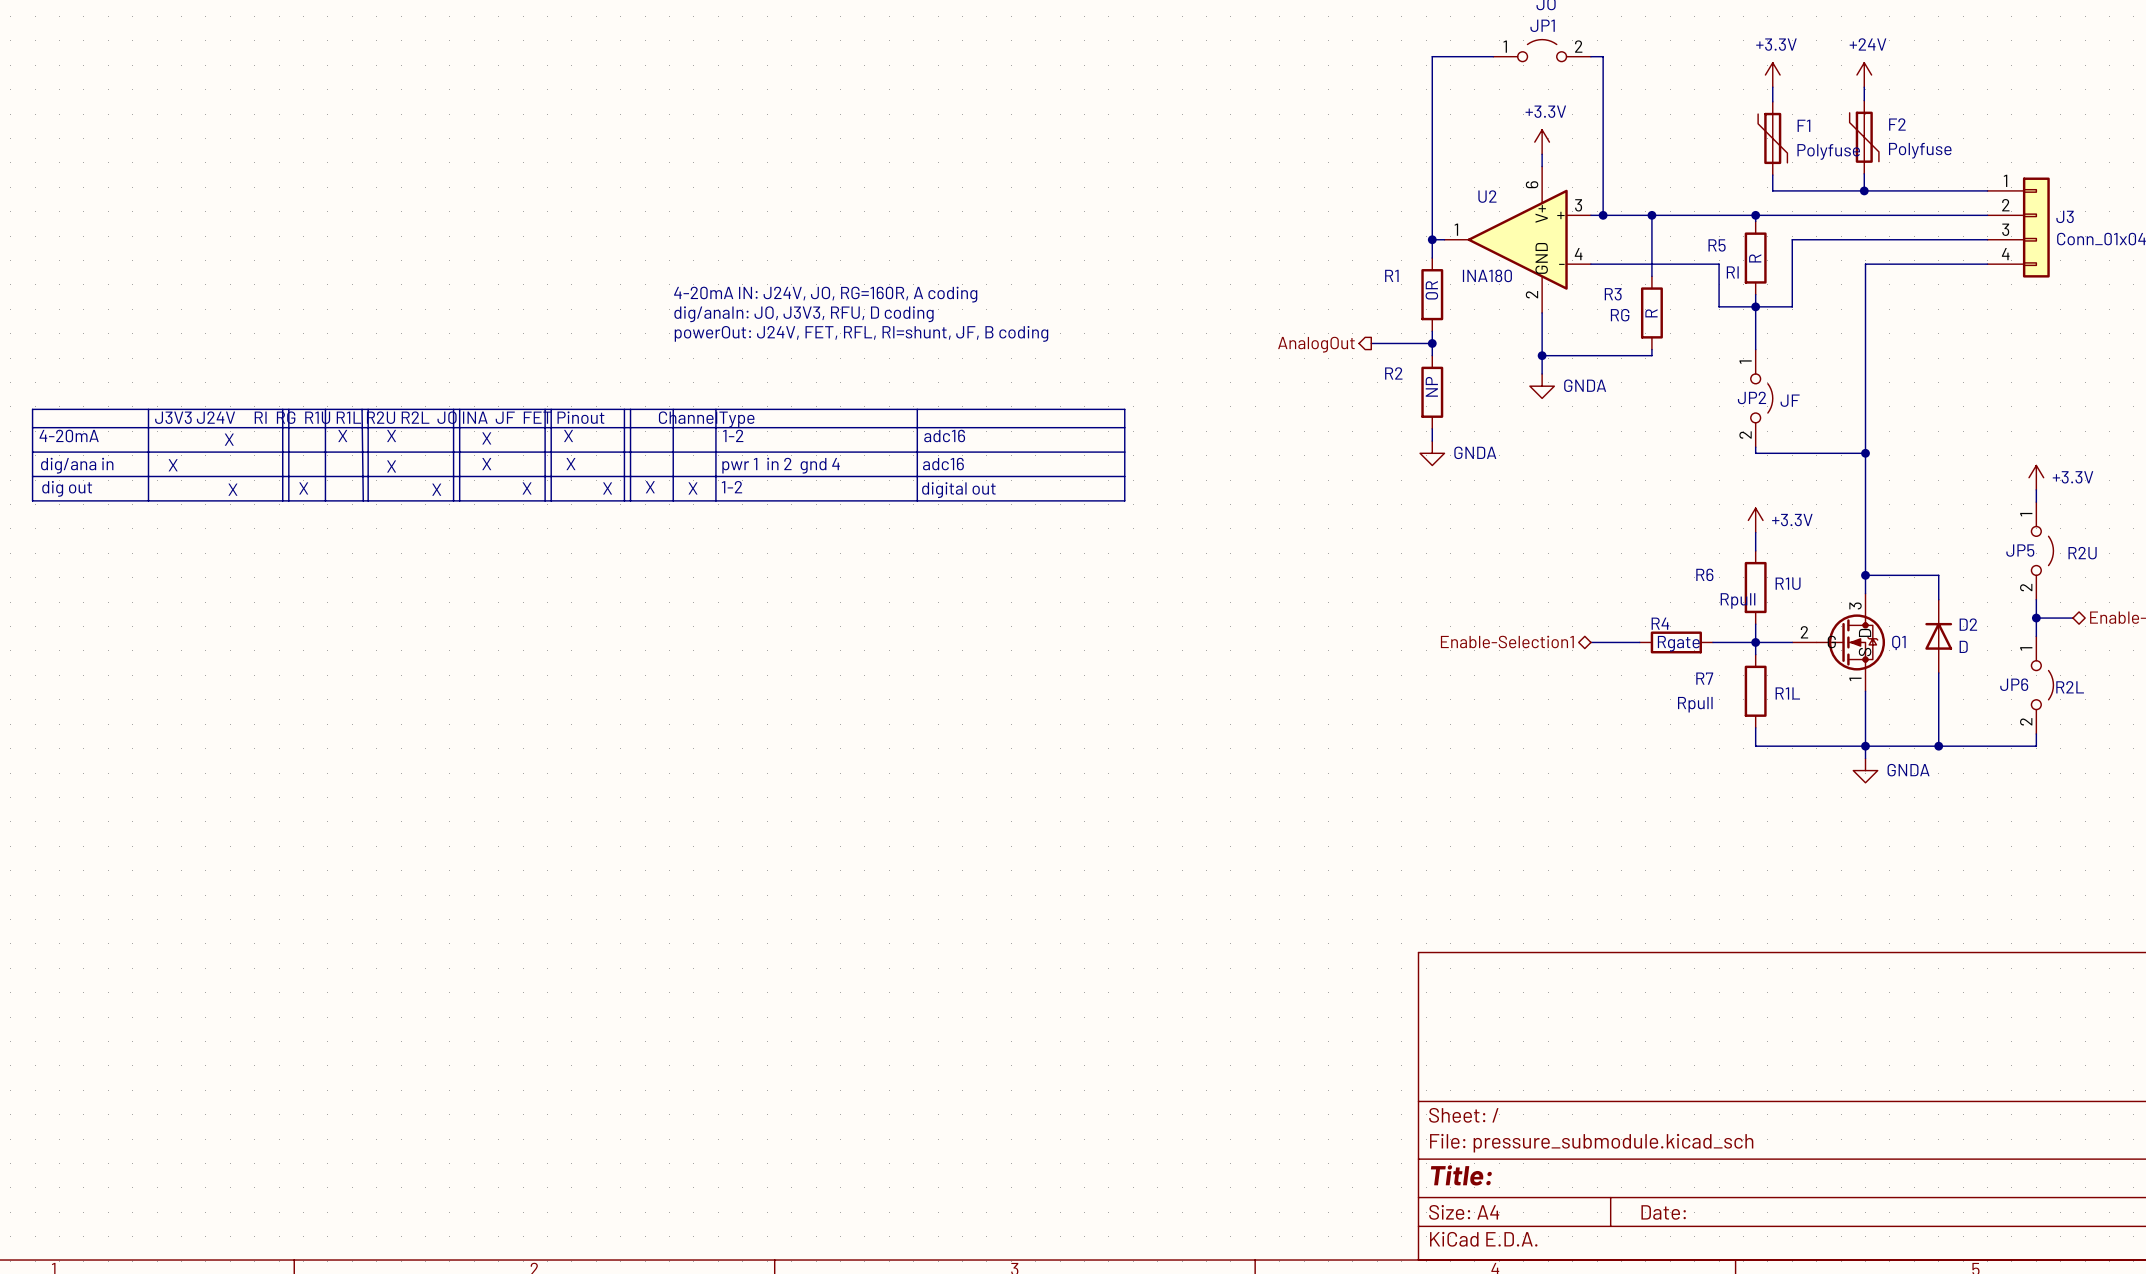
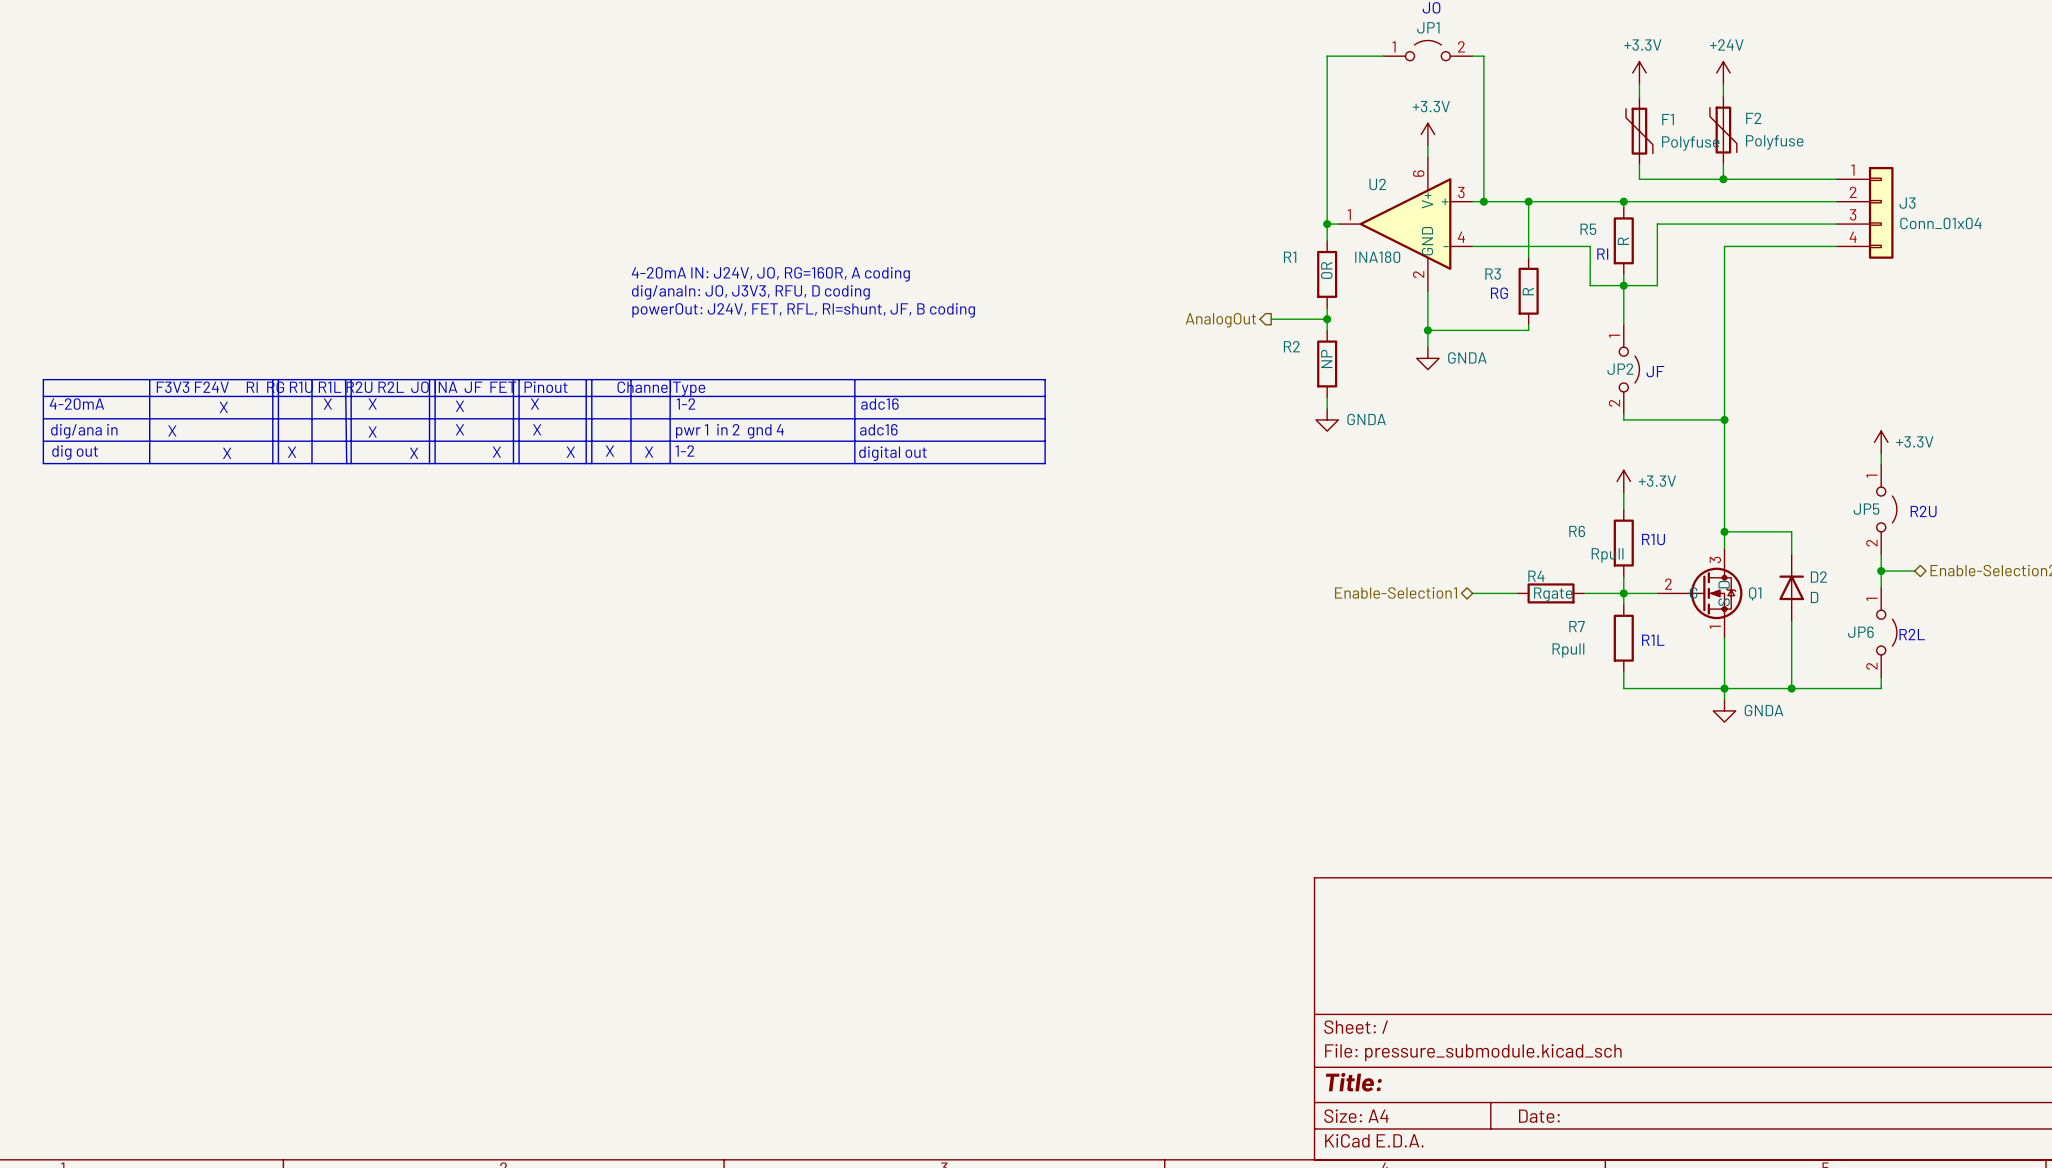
text: J3V3 J24V RI RG R1U R1L R2U R2L JO INA JF FET Pinout ChannelType (454, 419) -> F3V3 F24V RI RG R1U R1L R2U R2L JO INA JF FET Pinout ChannelType (430, 388)

